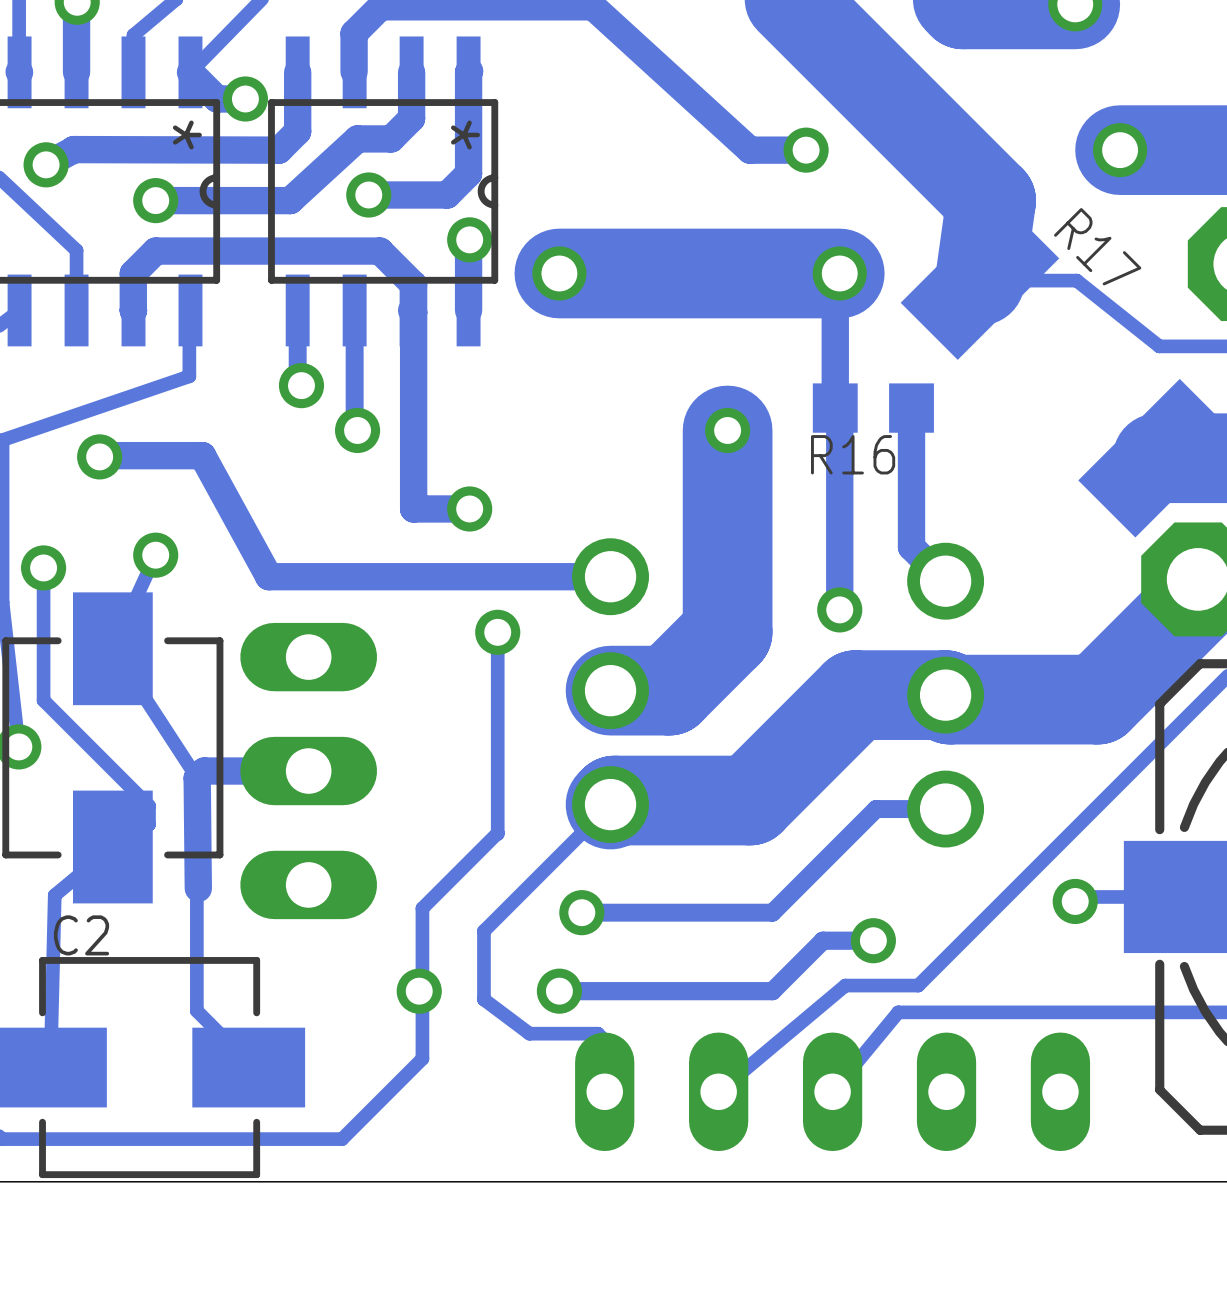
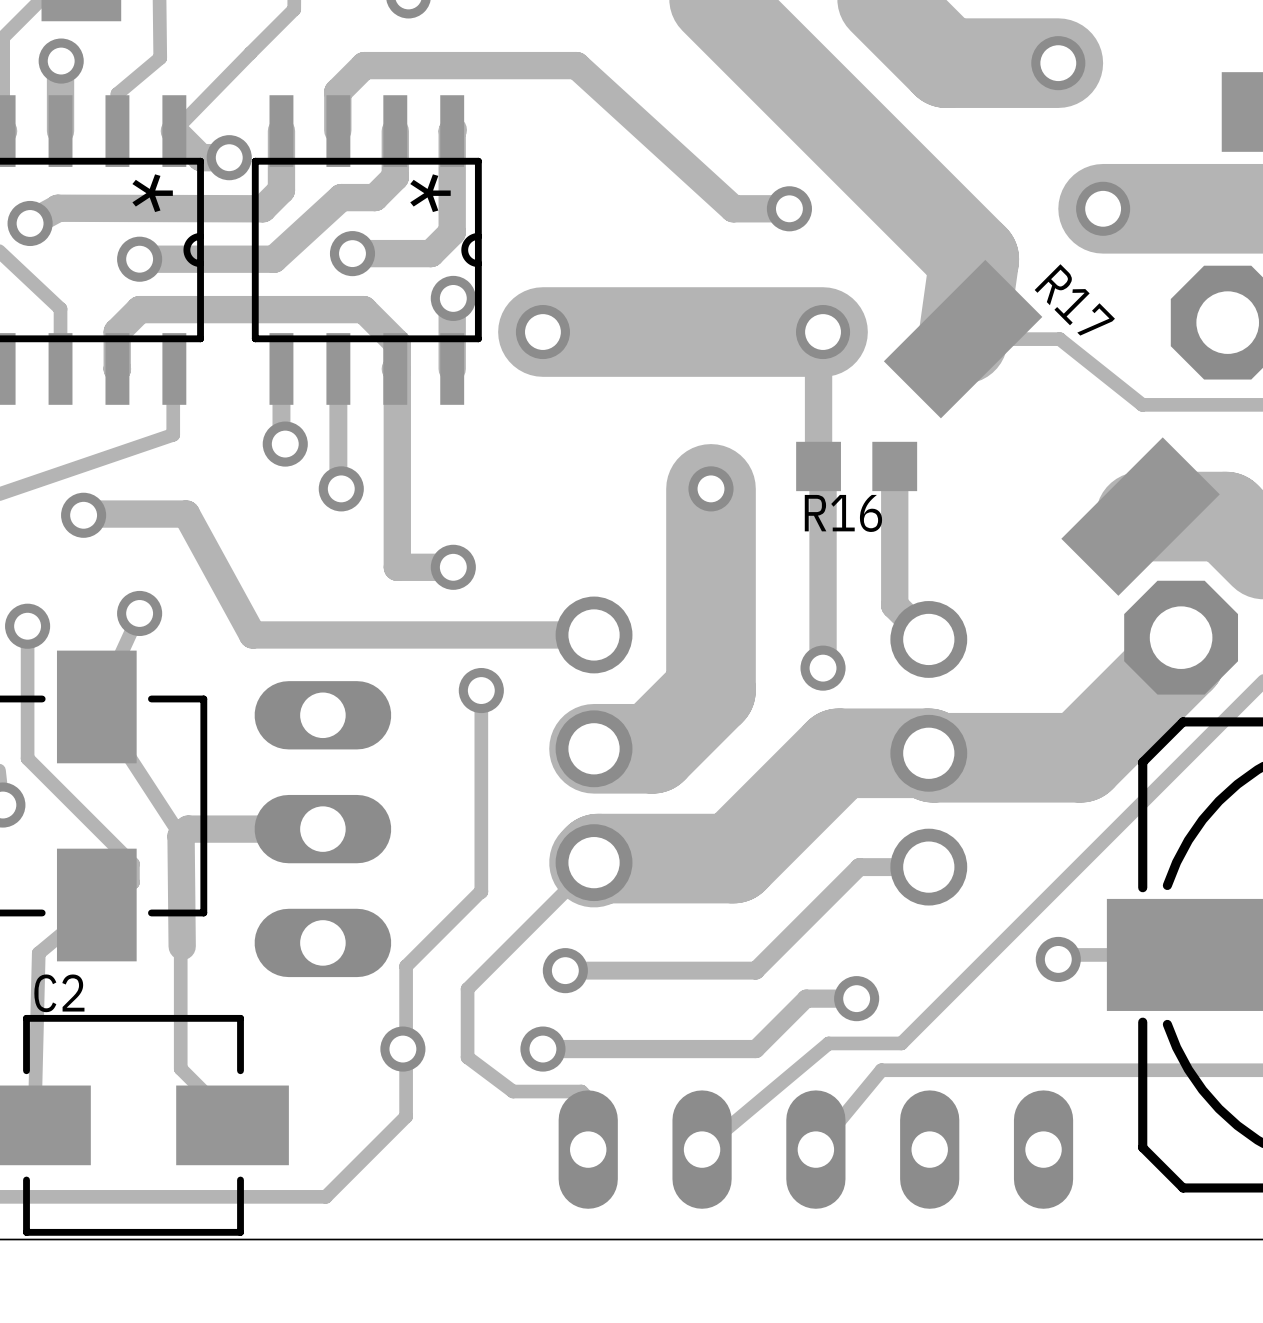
part position: (308, 771) -> (322, 829)

